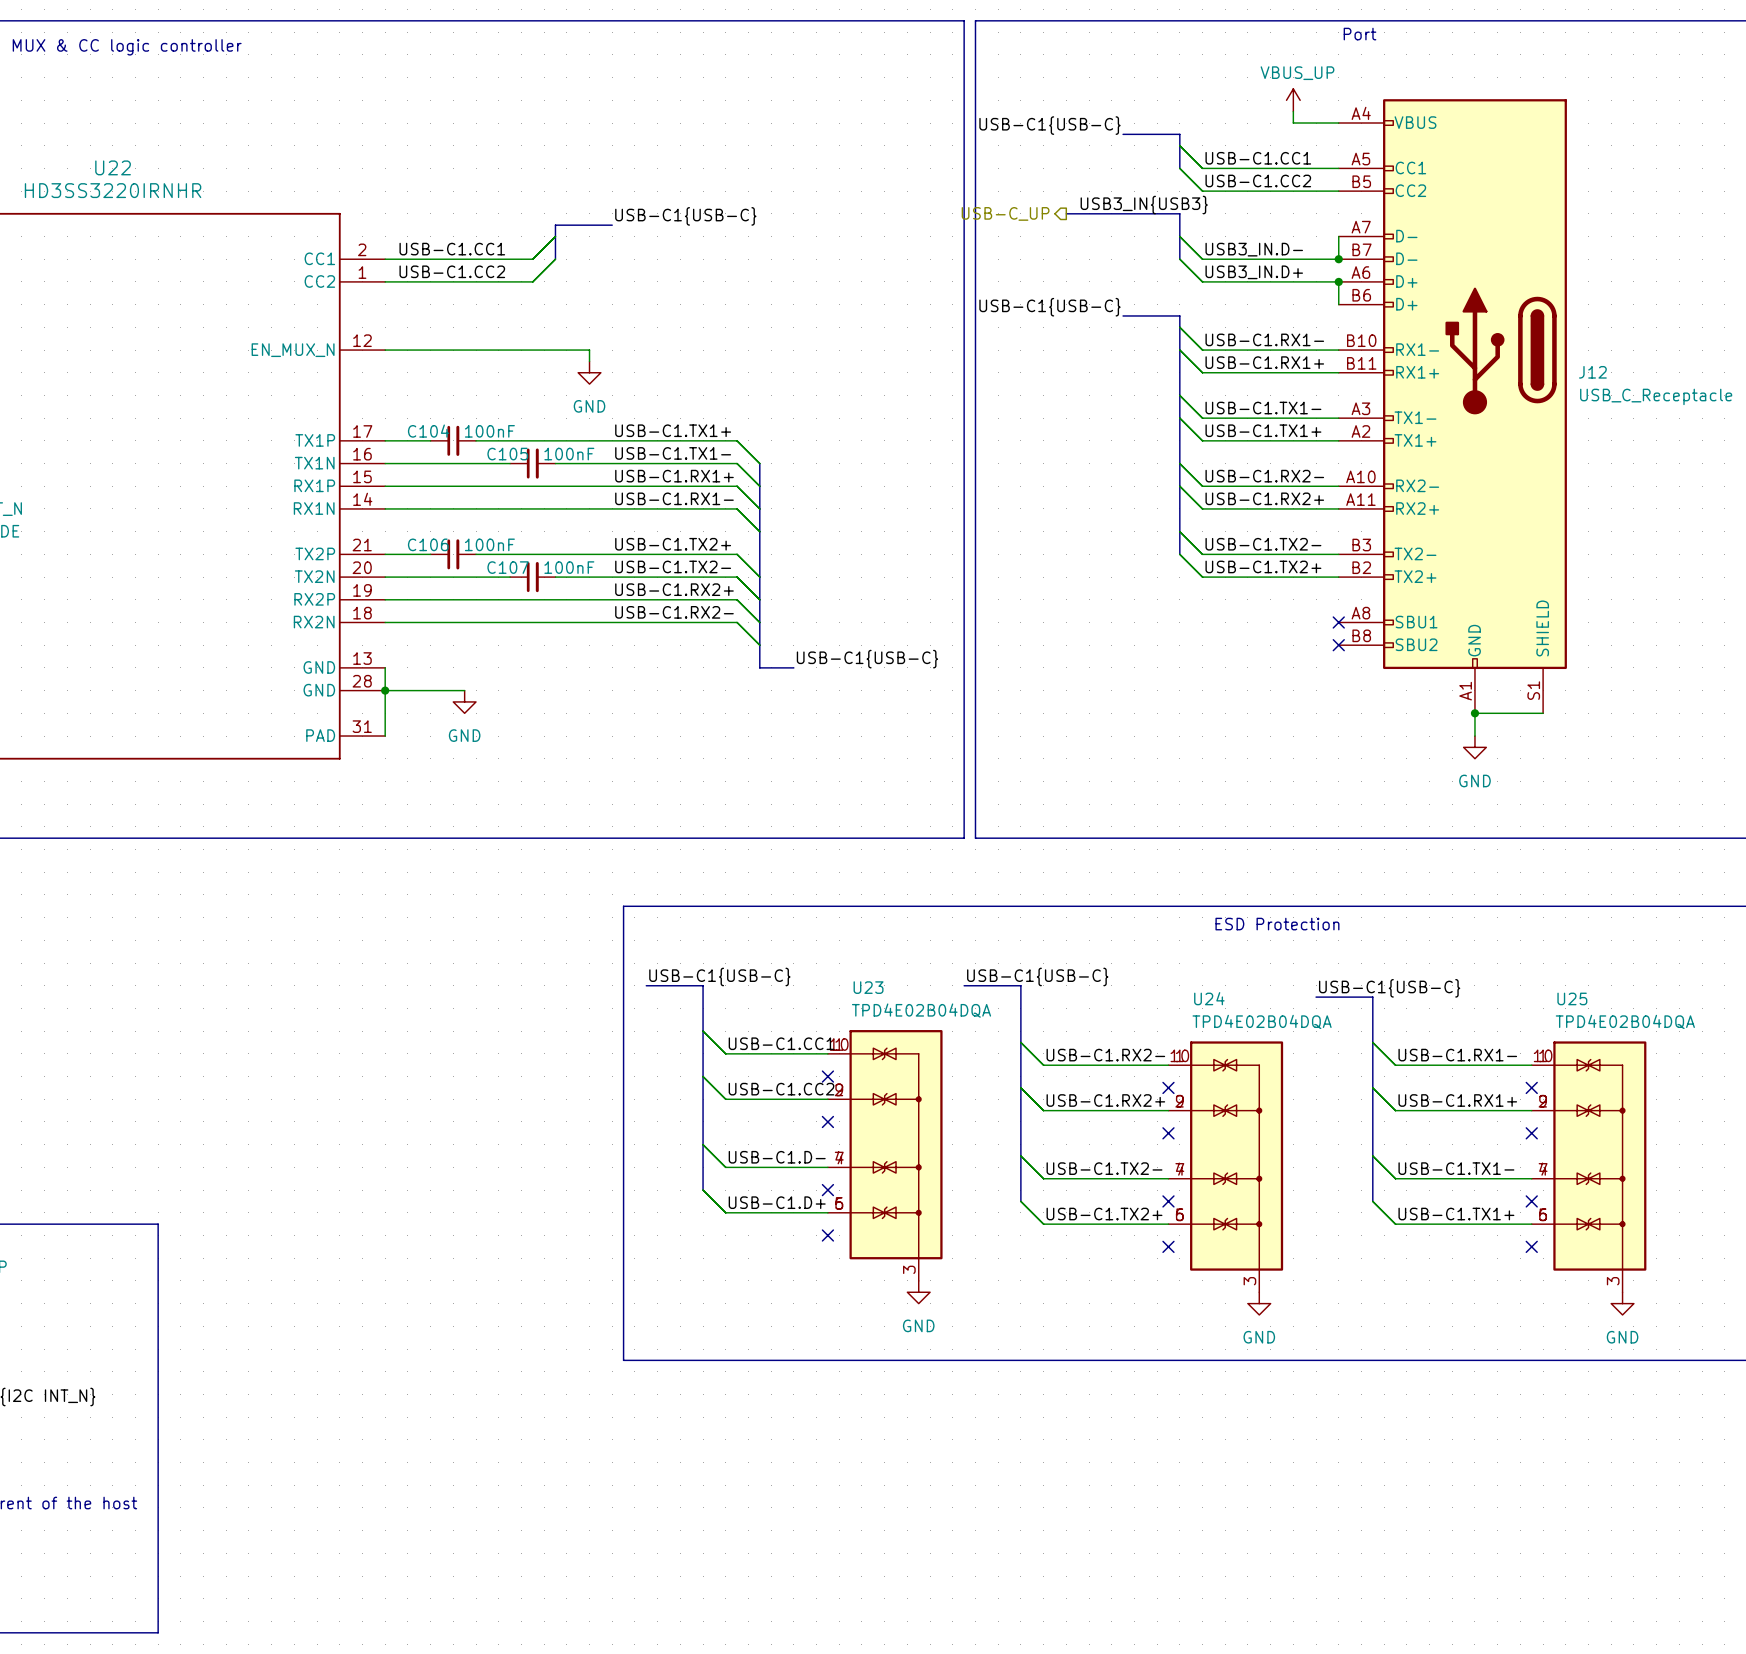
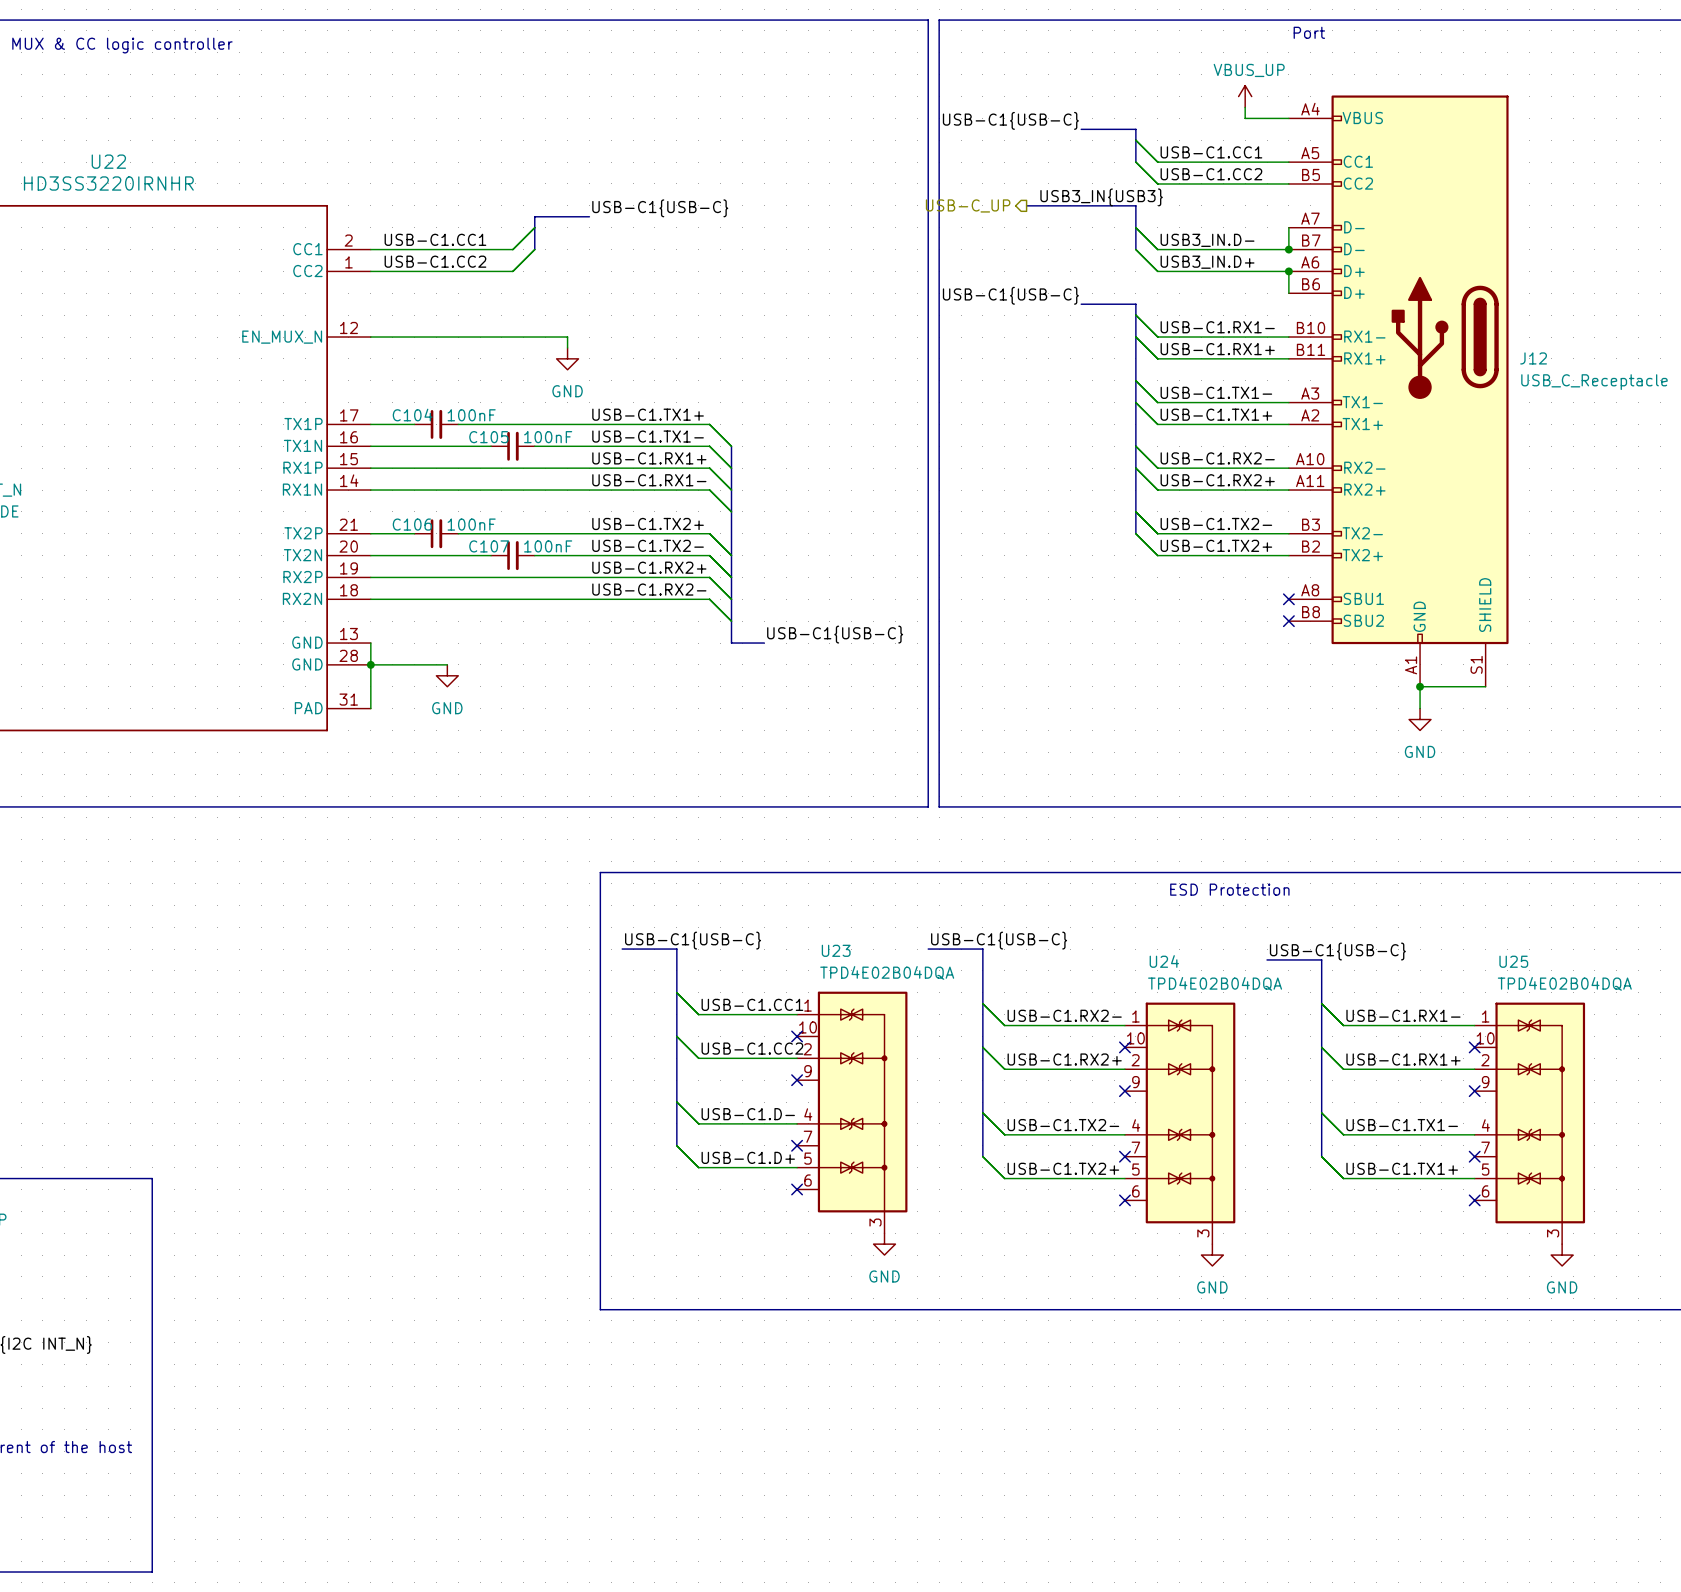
U23 symbol: [827, 1030, 943, 1281] -> [797, 991, 908, 1234]
U24 symbol: [1168, 1041, 1284, 1293] -> [1124, 1002, 1236, 1245]
U25 symbol: [1531, 1041, 1647, 1293] -> [1474, 1002, 1586, 1245]

